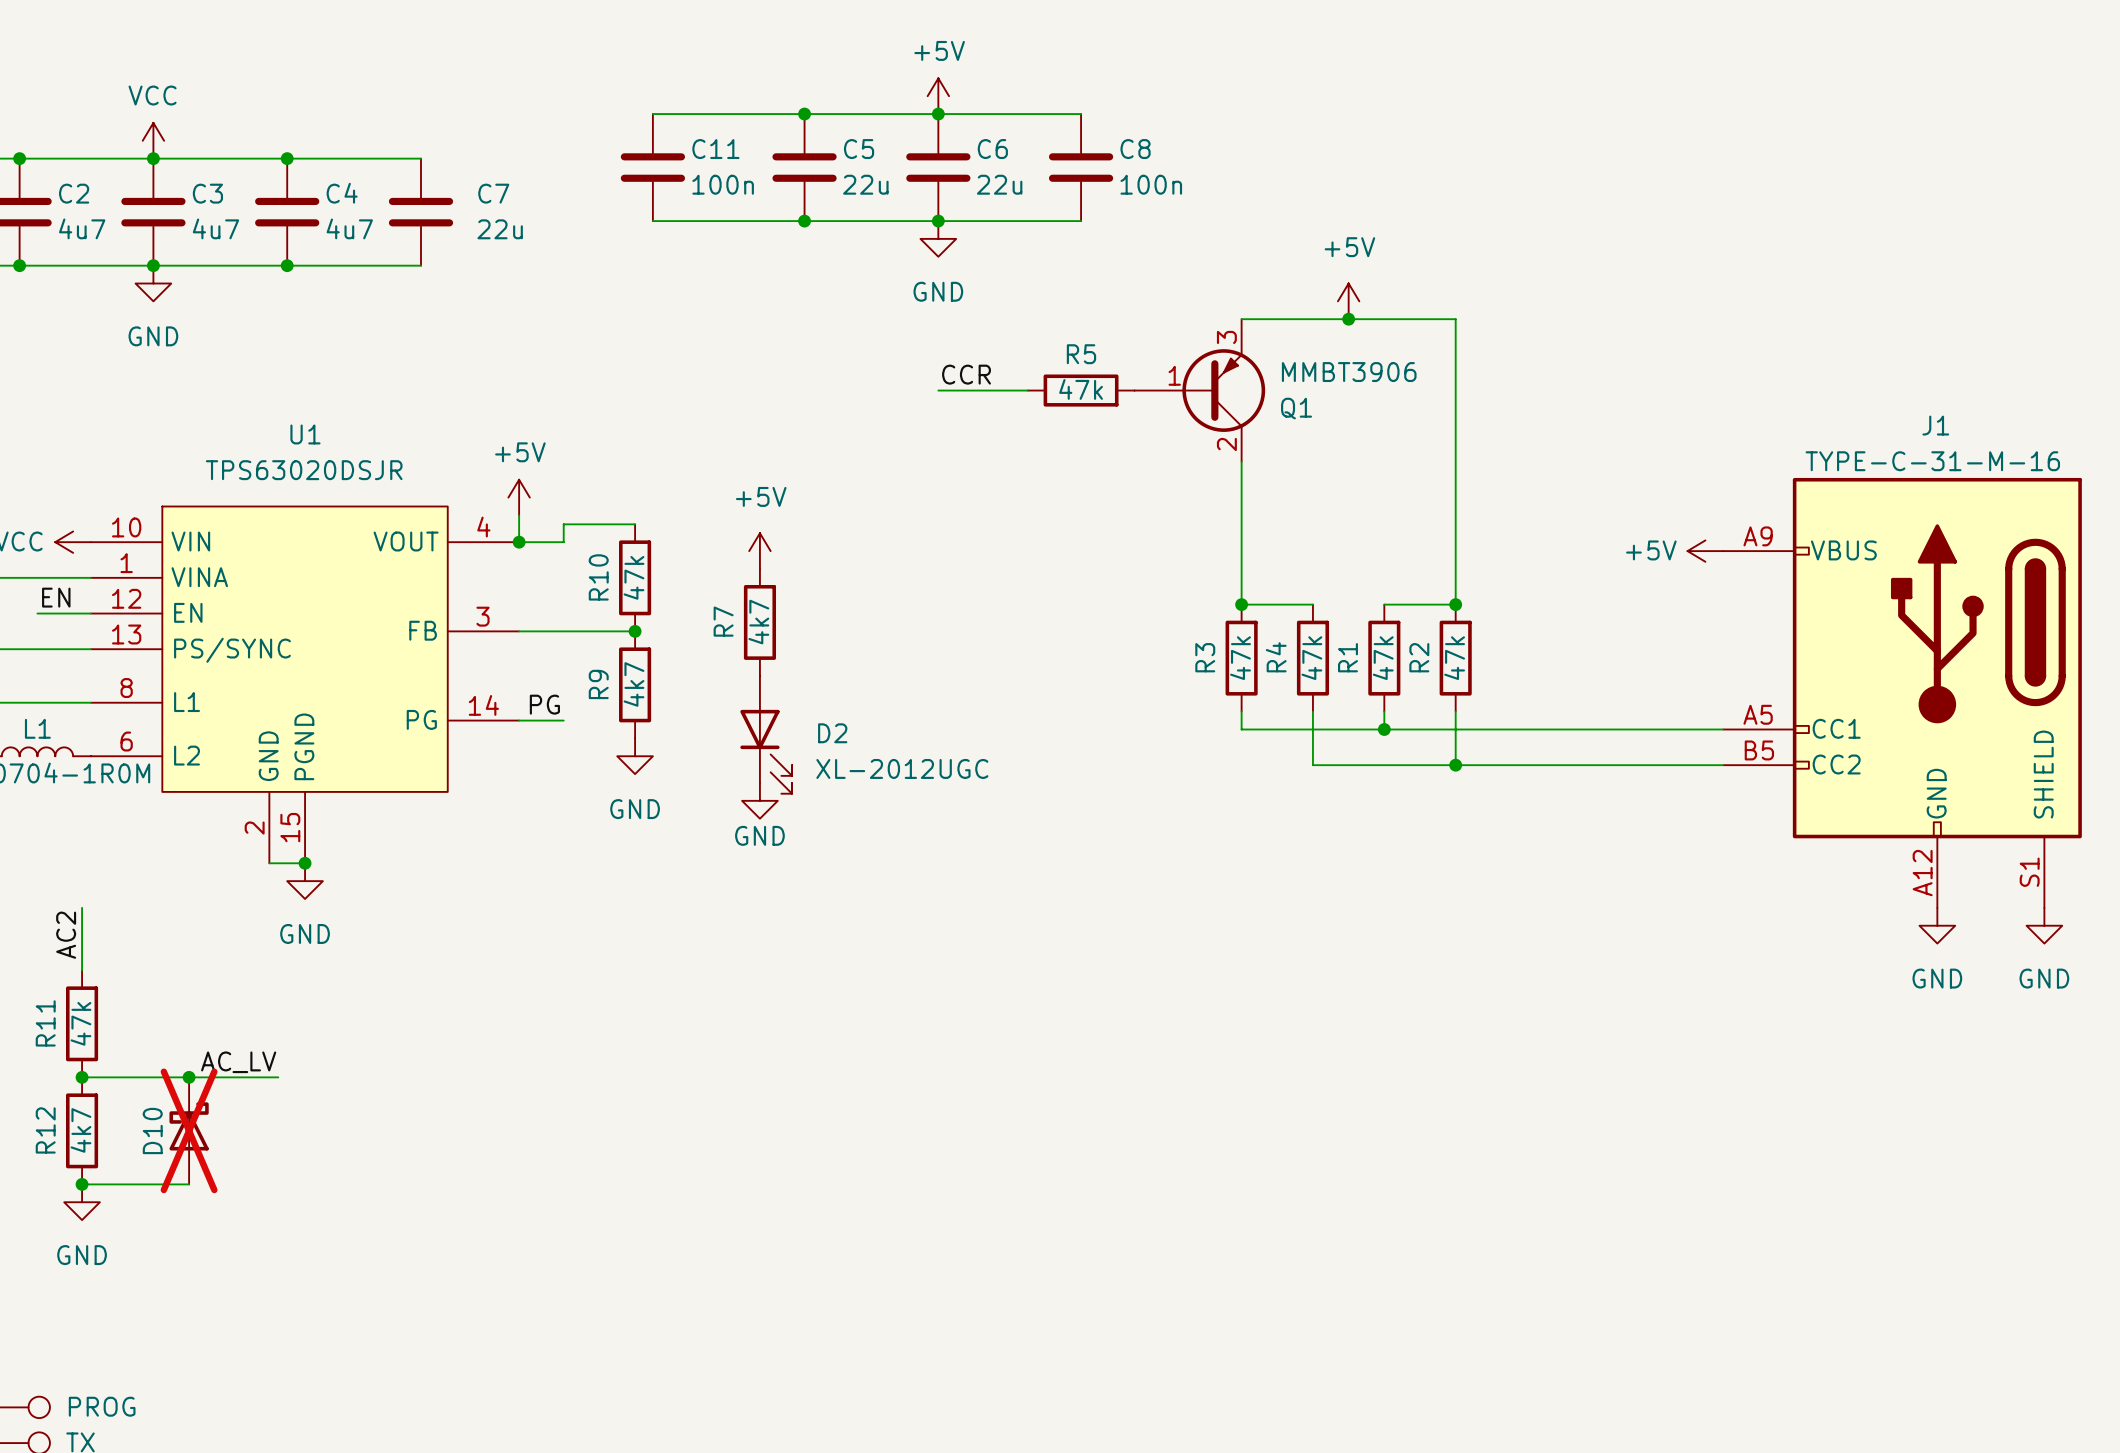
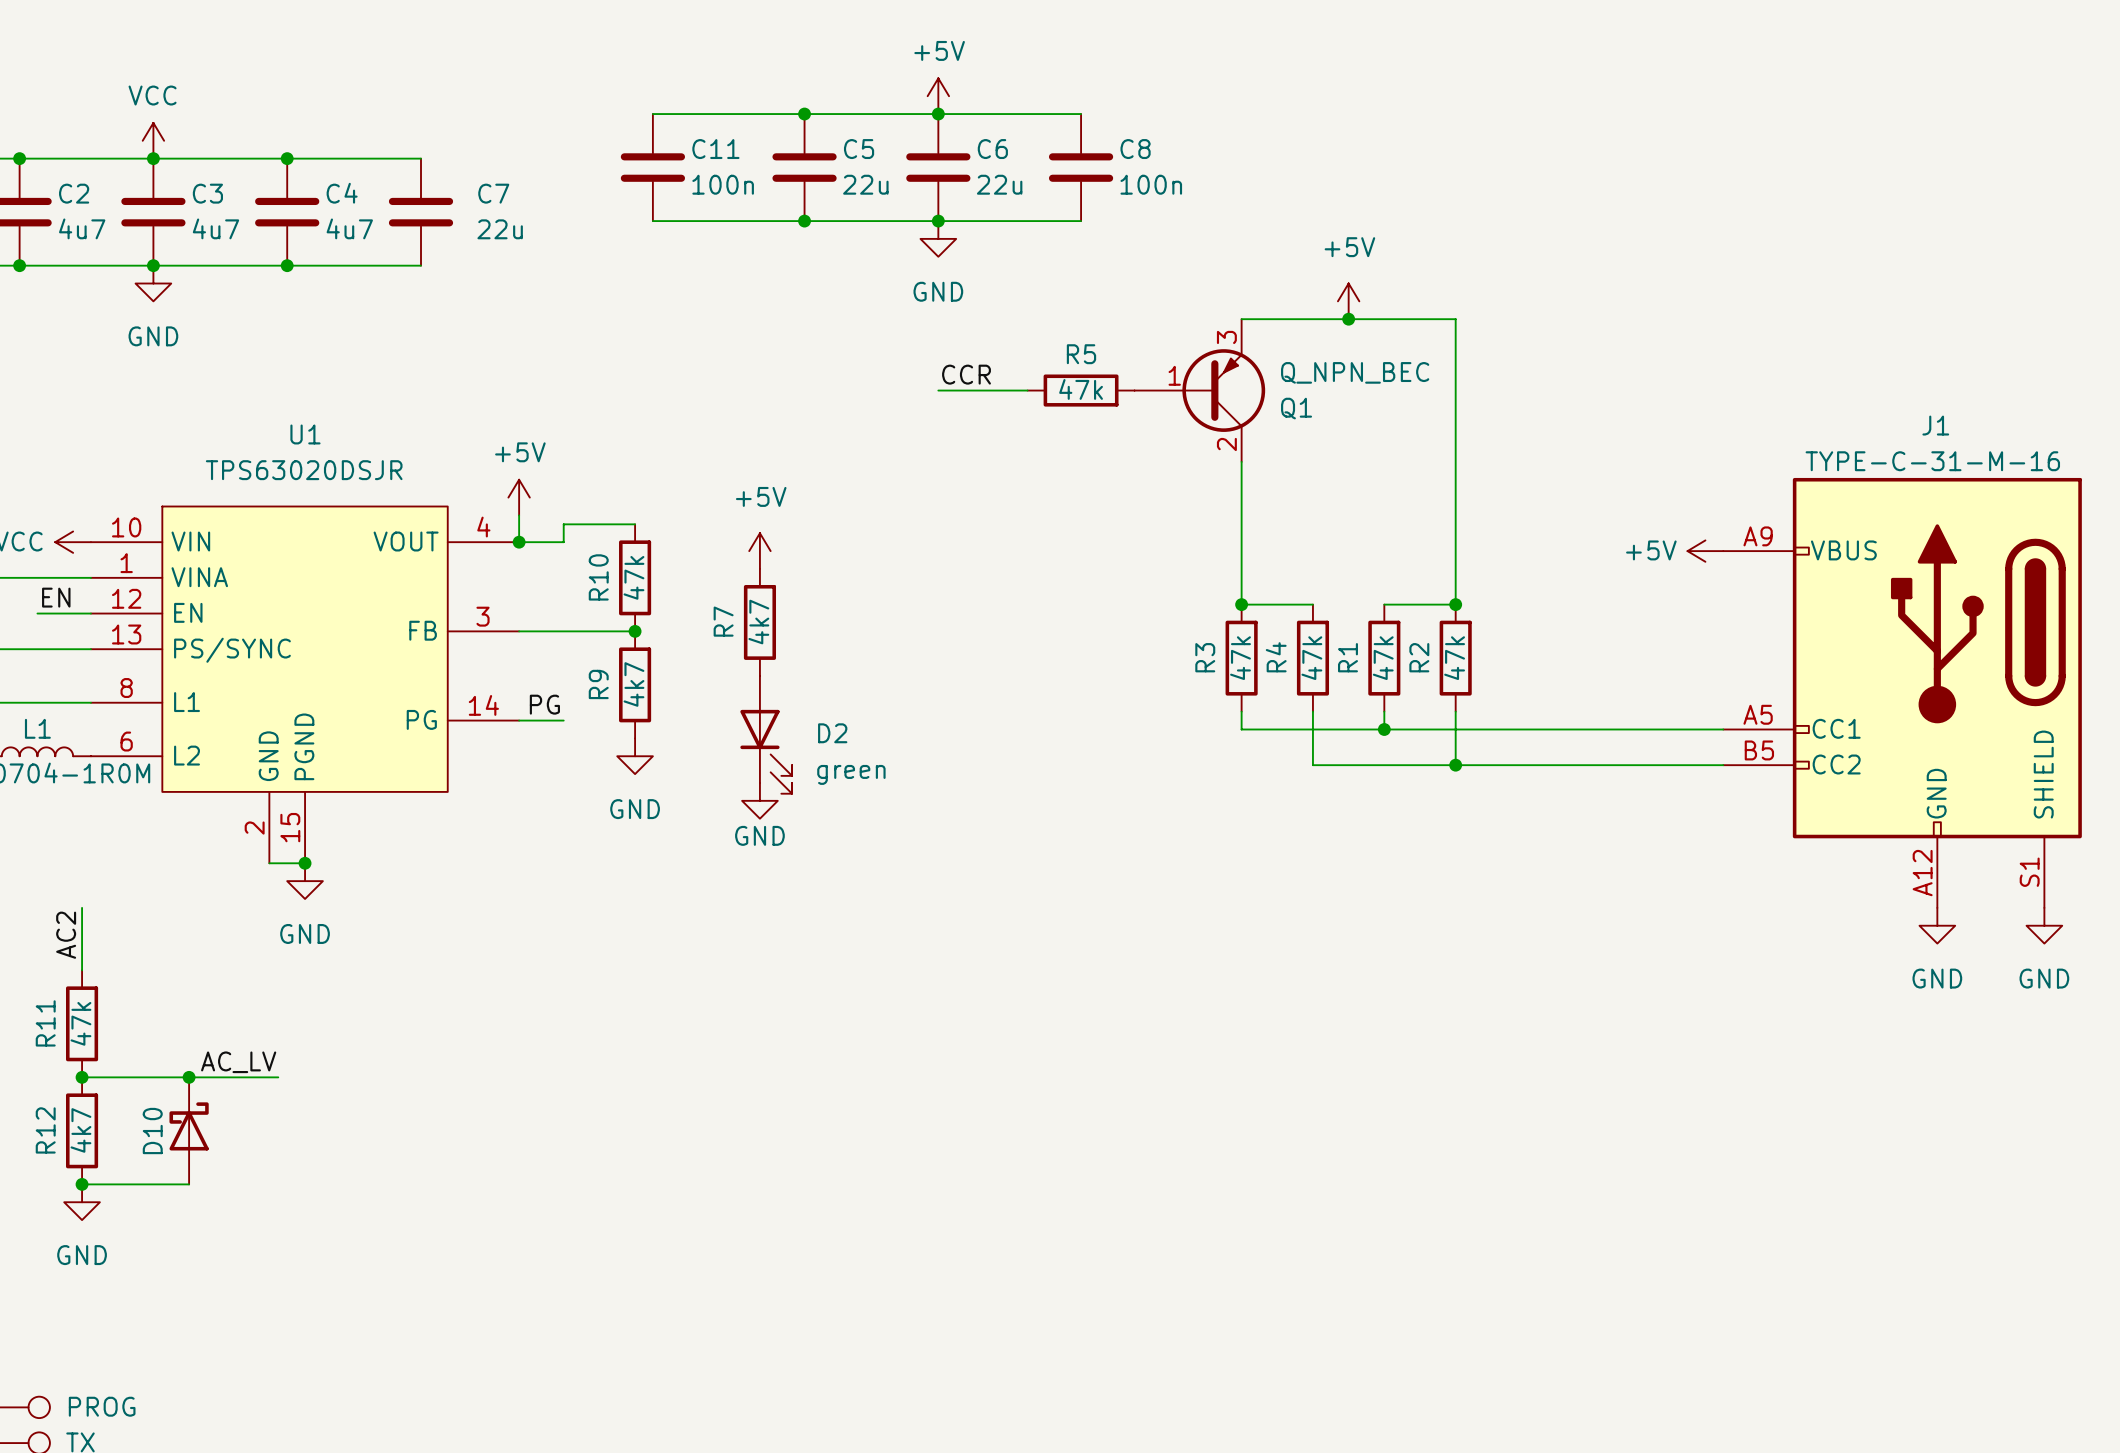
Q1 value: MMBT3906 (1349, 372) -> Q_NPN_BEC (1355, 372)
D2 value: XL-2012UGC (902, 768) -> green (851, 774)
D10 do-not-place cross: (189, 1130) -> none

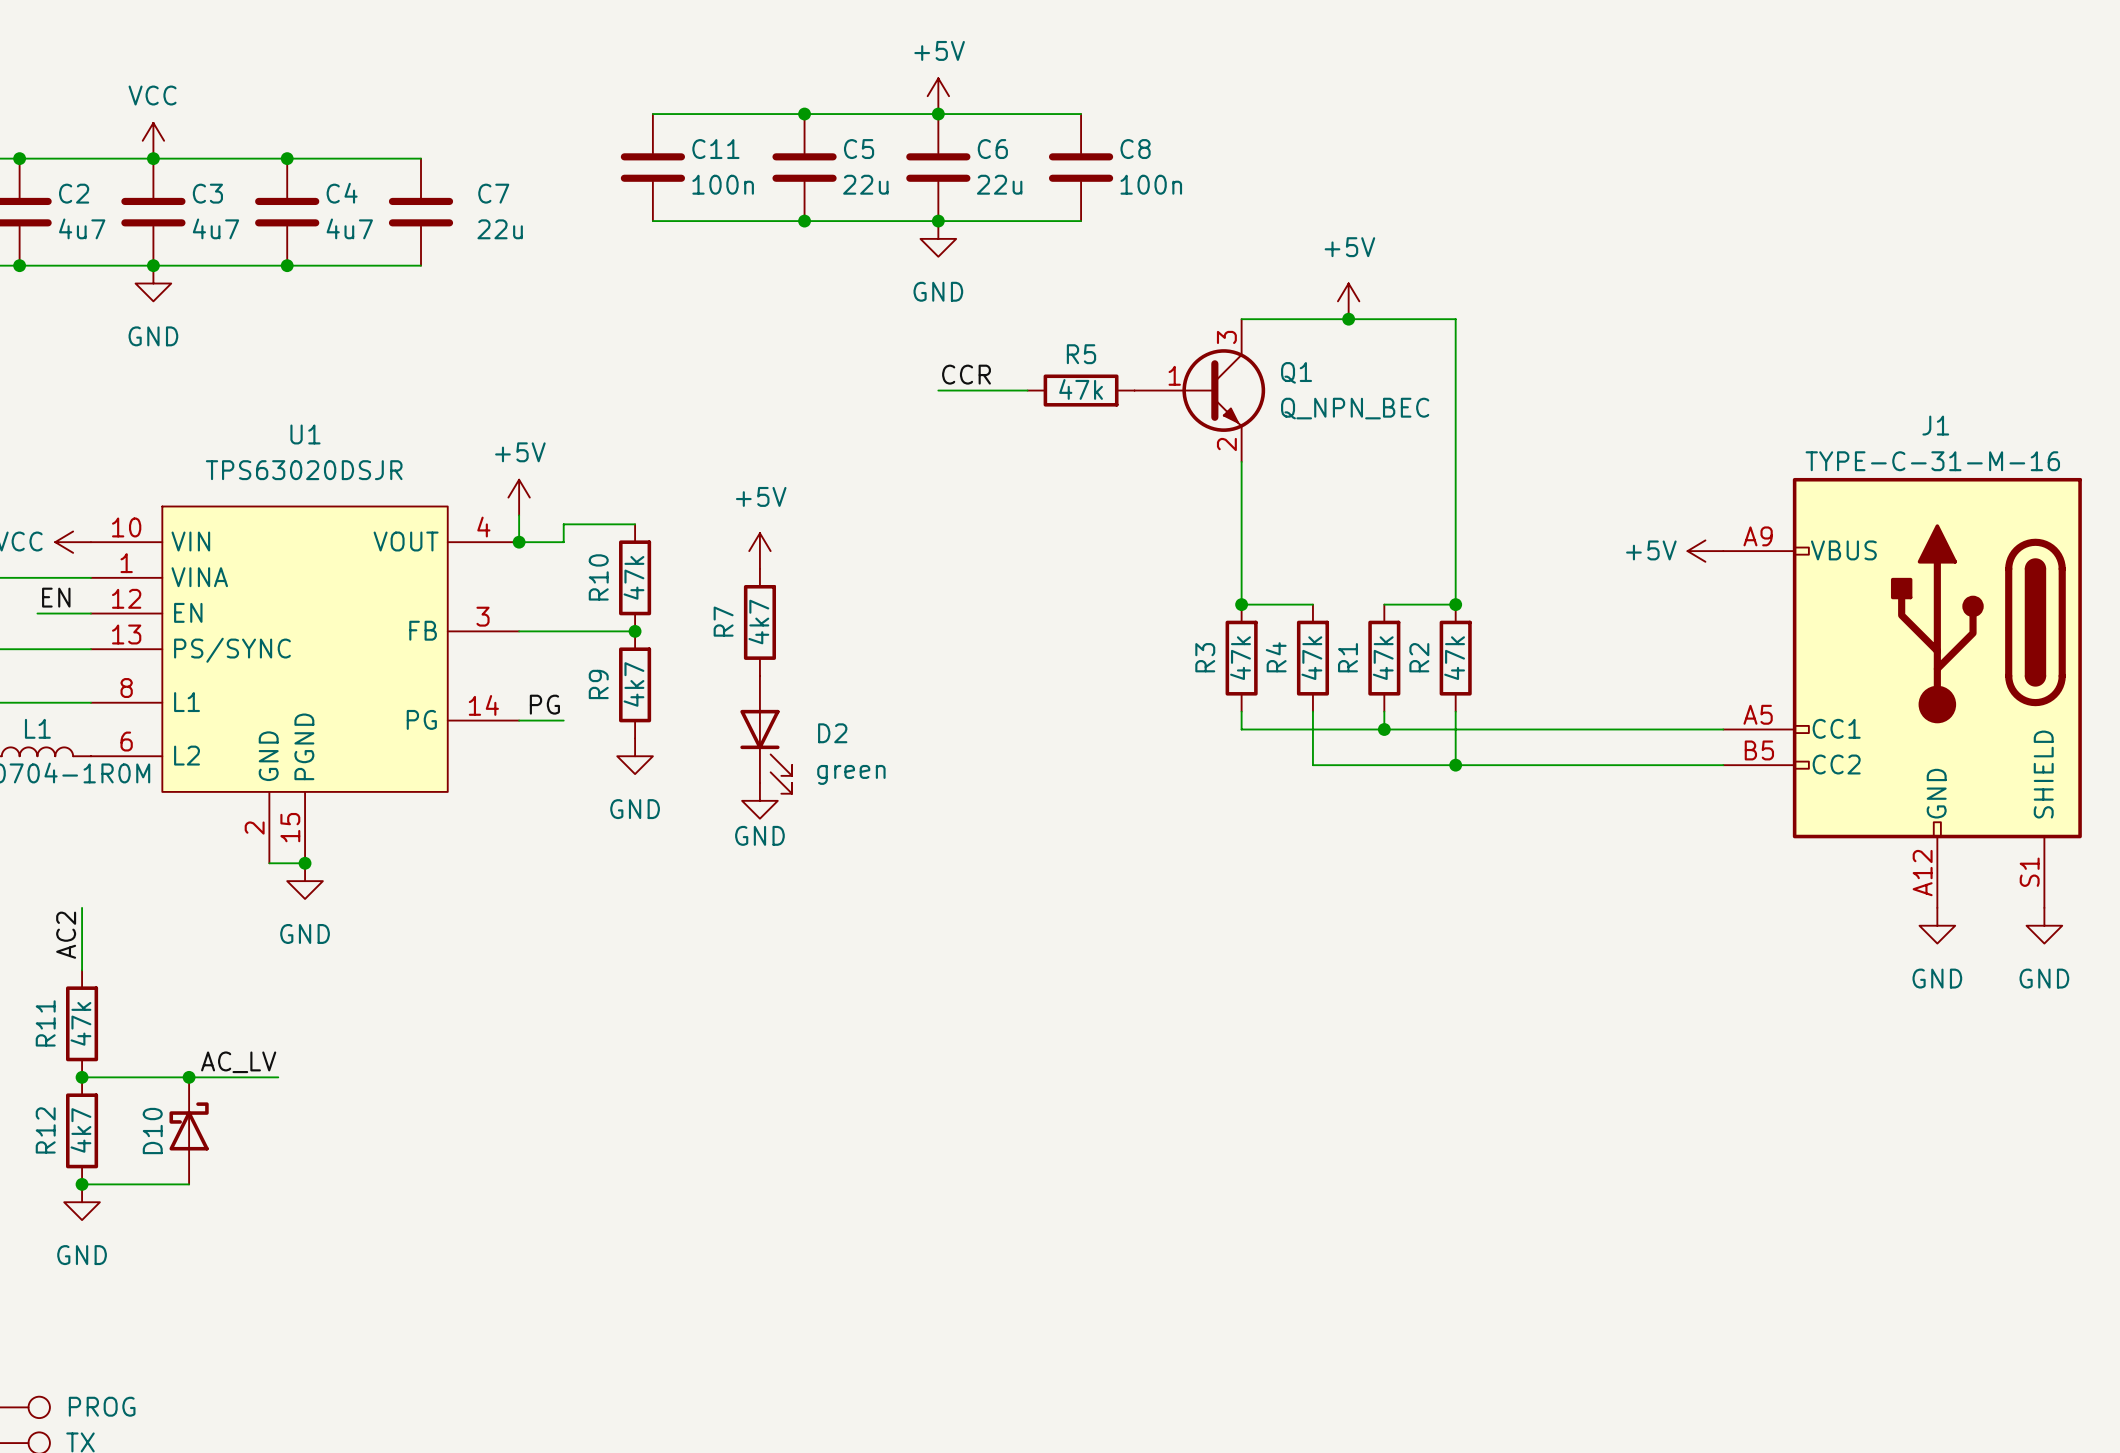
Q1 symbol: [1134, 319, 1266, 462] -> [1134, 319, 1266, 462]
Q1 value position: Q_NPN_BEC (1355, 372) -> Q_NPN_BEC (1355, 408)
Q1 name position: Q1 (1296, 408) -> Q1 (1296, 372)

